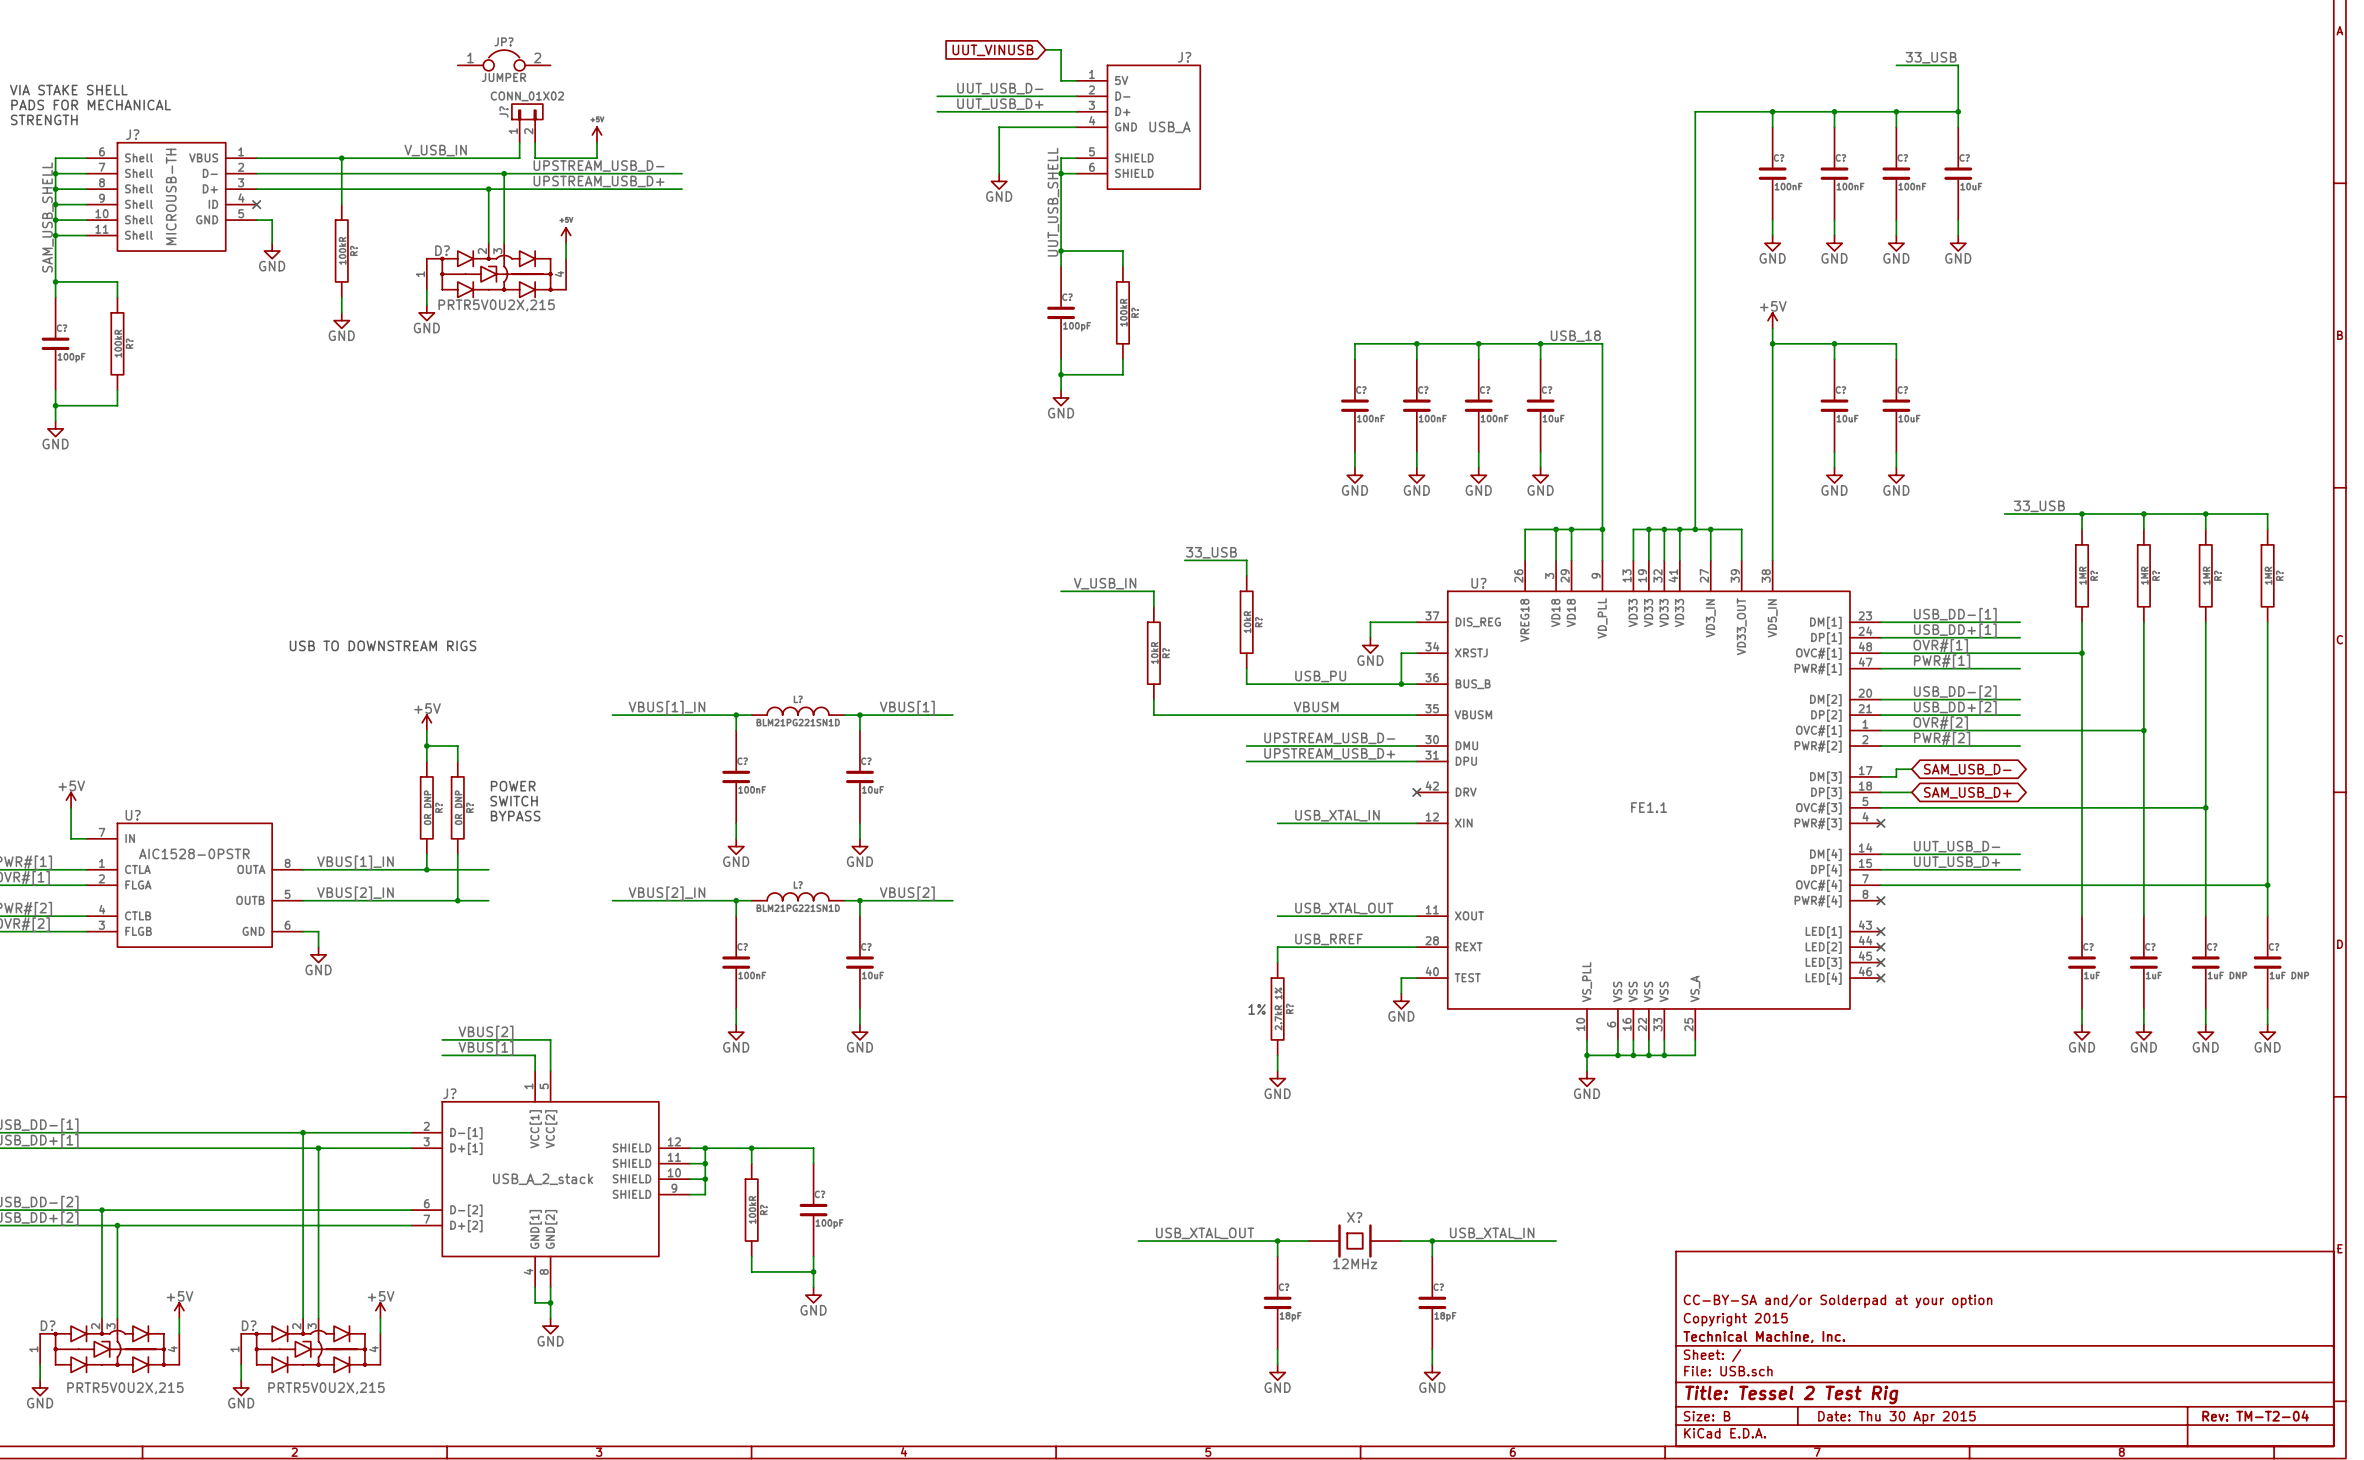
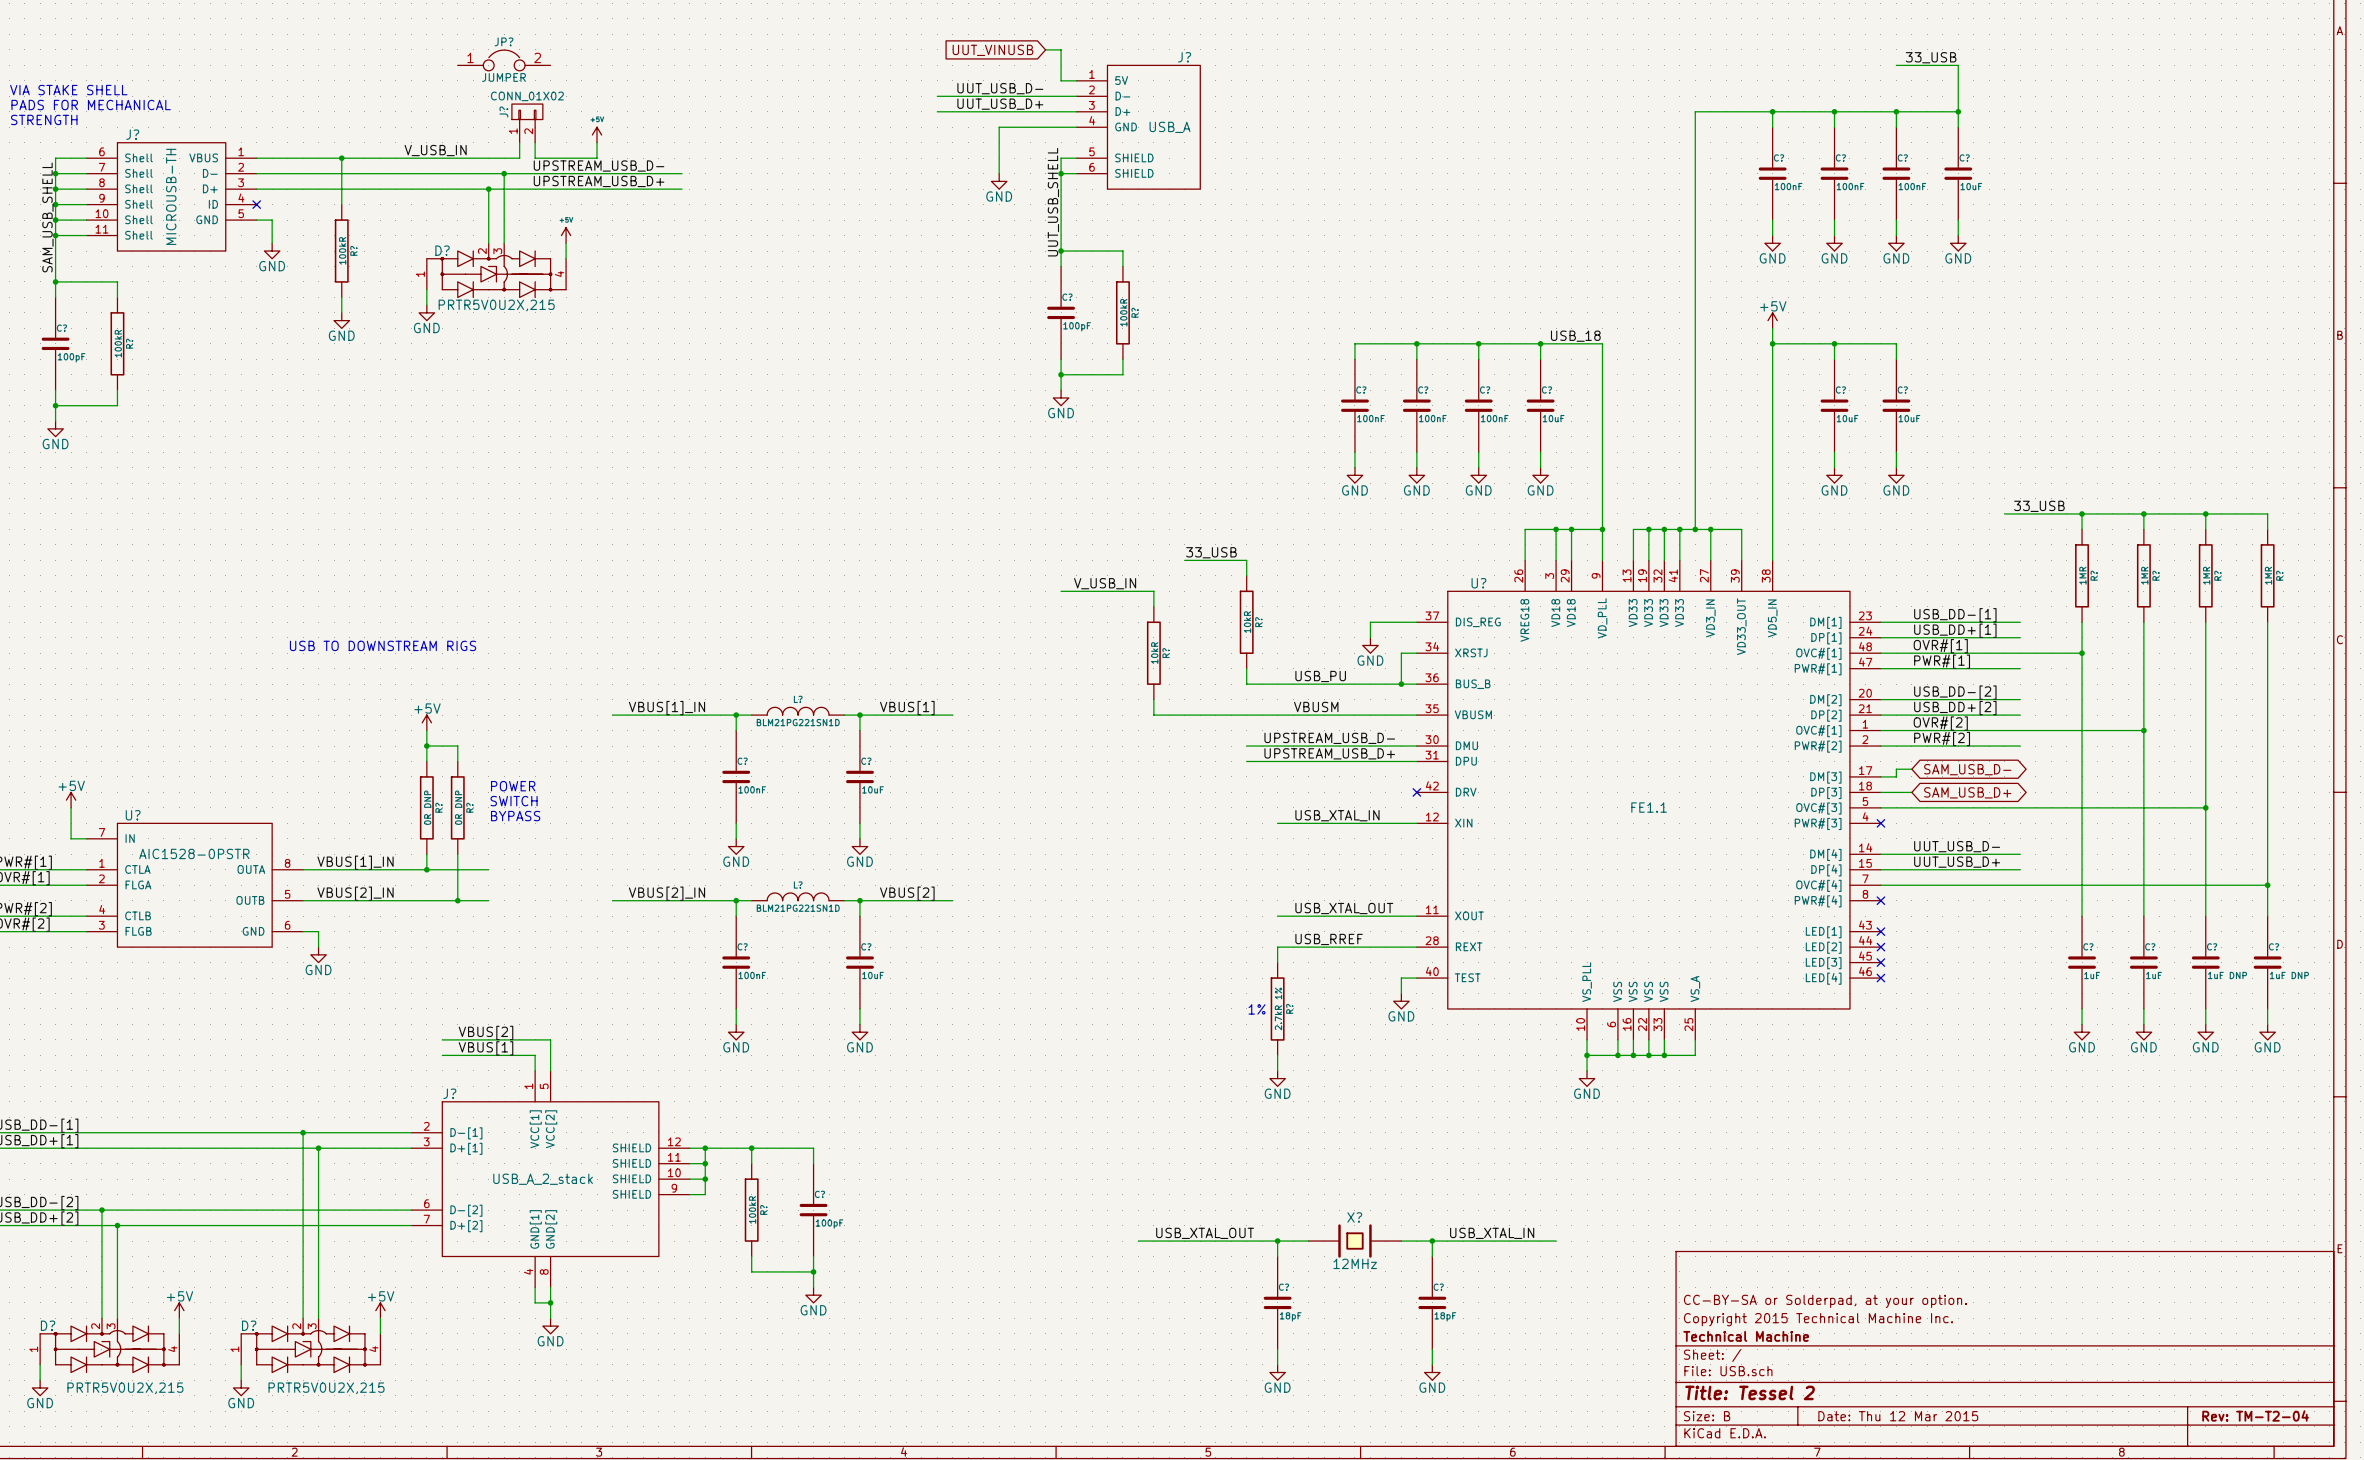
title block: CC-BY-SA and/or Solderpad at your option (1838, 1301) -> CC-BY-SA or Solderpad, at your option. (1825, 1301)
title block: Copyright 2015 (1735, 1319) -> Copyright 2015 Technical Machine Inc. (1818, 1319)
title block: Technical Machine, Inc. (1764, 1337) -> Technical Machine (1746, 1336)
title block: Title: Tessel 2 Test Rig (1791, 1394) -> Title: Tessel 2 (1750, 1392)
title block: Date: Thu 30 Apr 2015 (1896, 1417) -> Date: Thu 12 Mar 2015 (1898, 1416)

